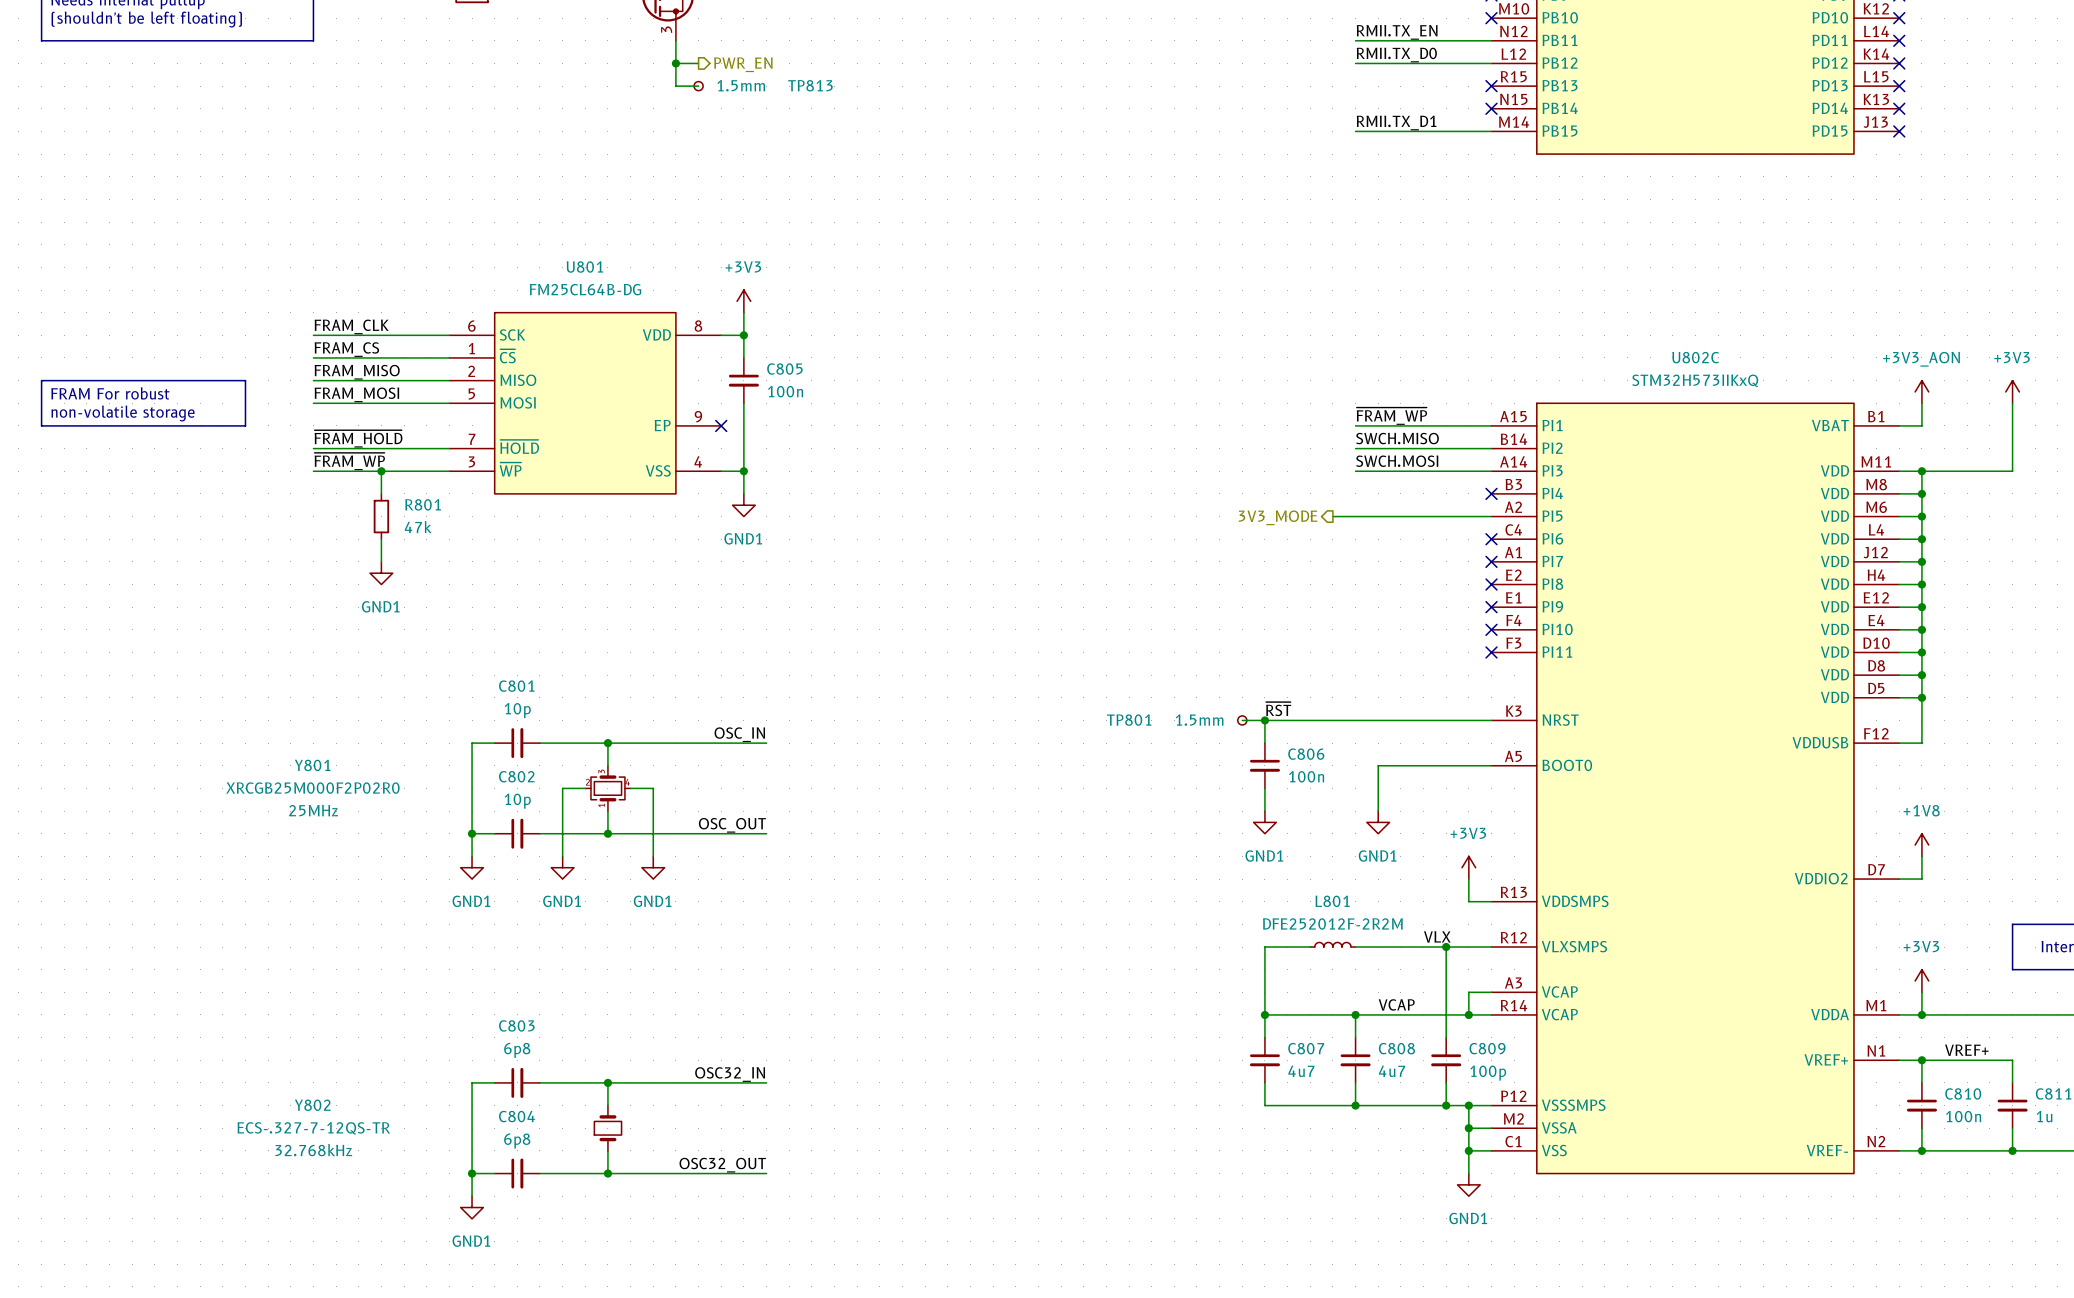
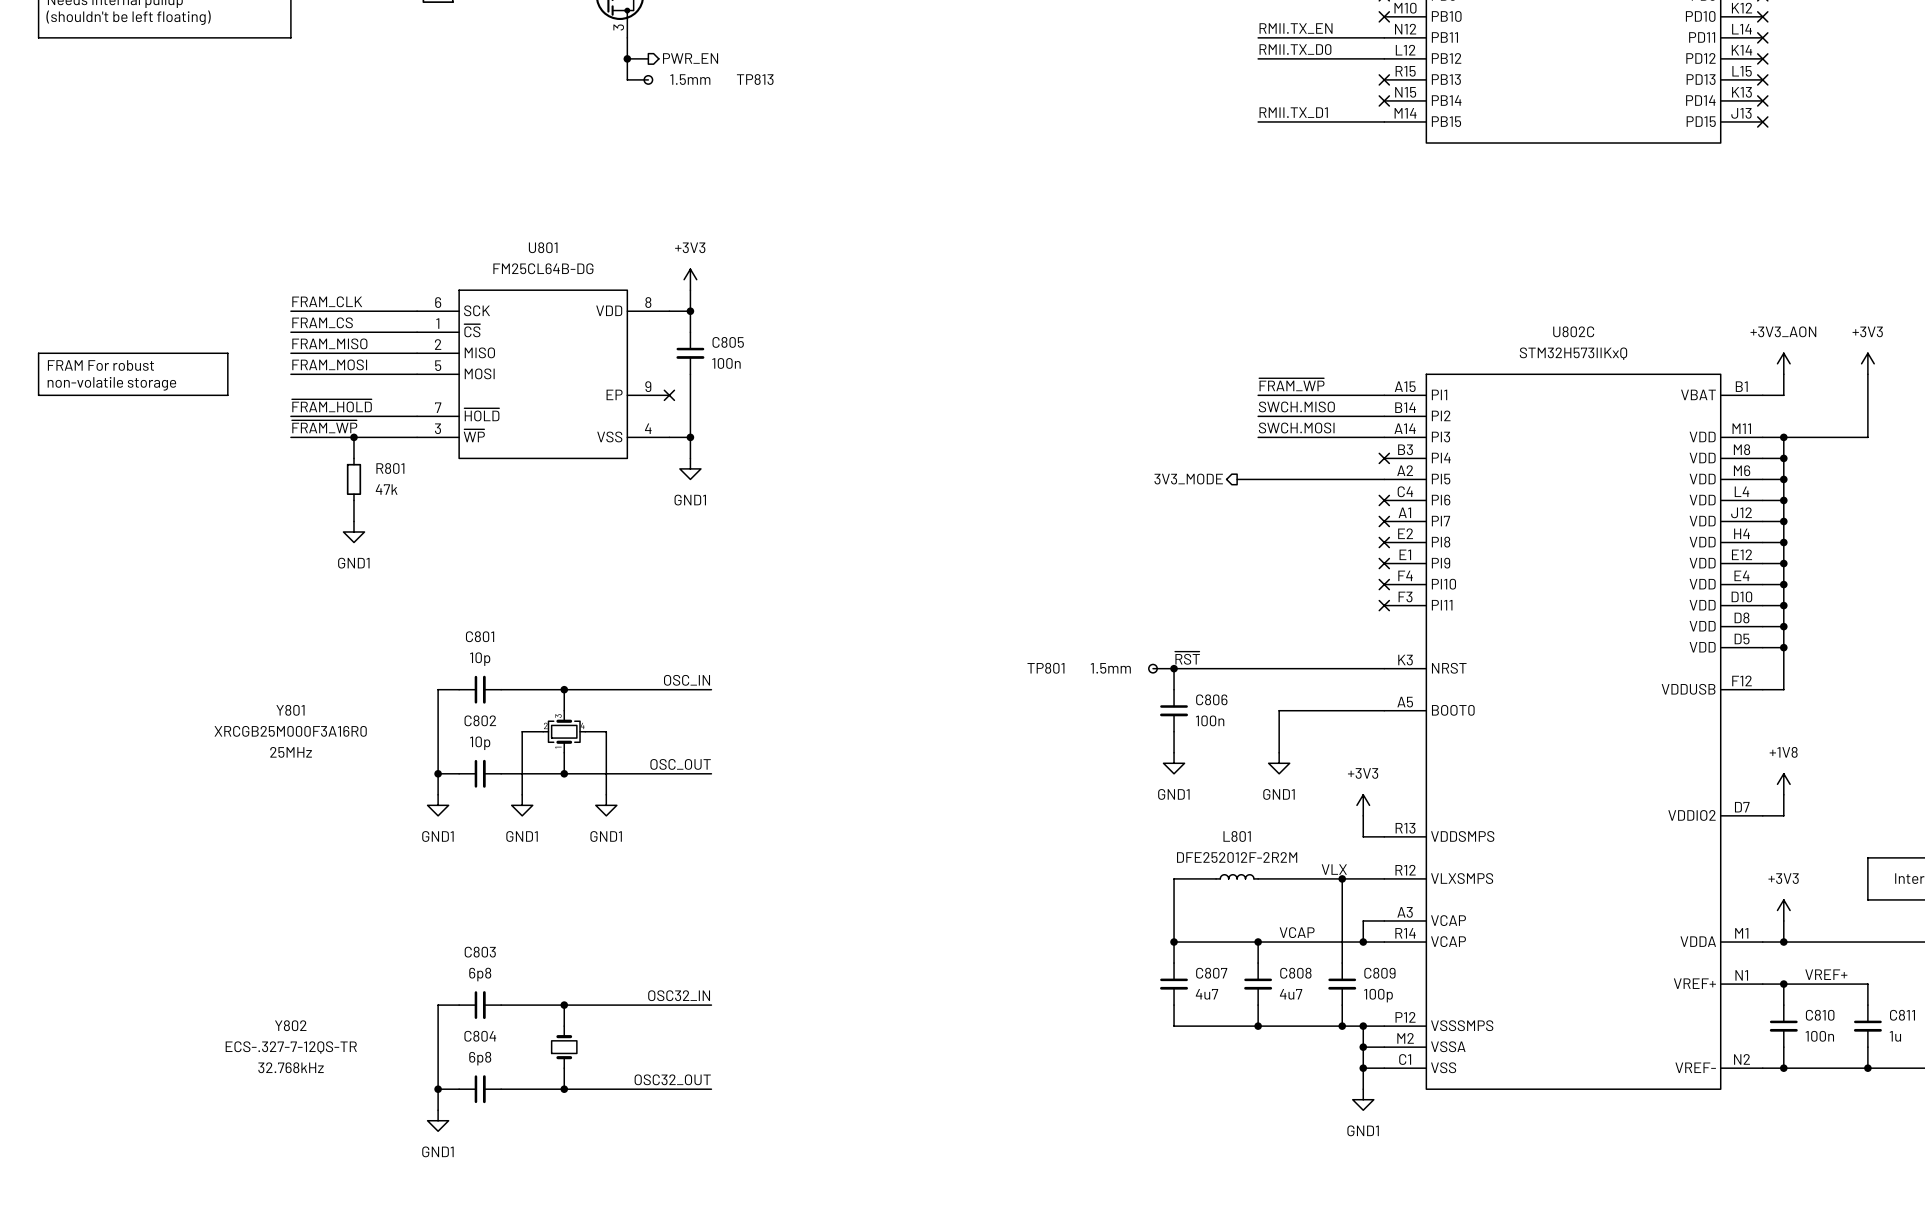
Y801 value: XRCGB25M000F2P02R0 (312, 788) -> XRCGB25M000F3A16R0 (290, 731)

